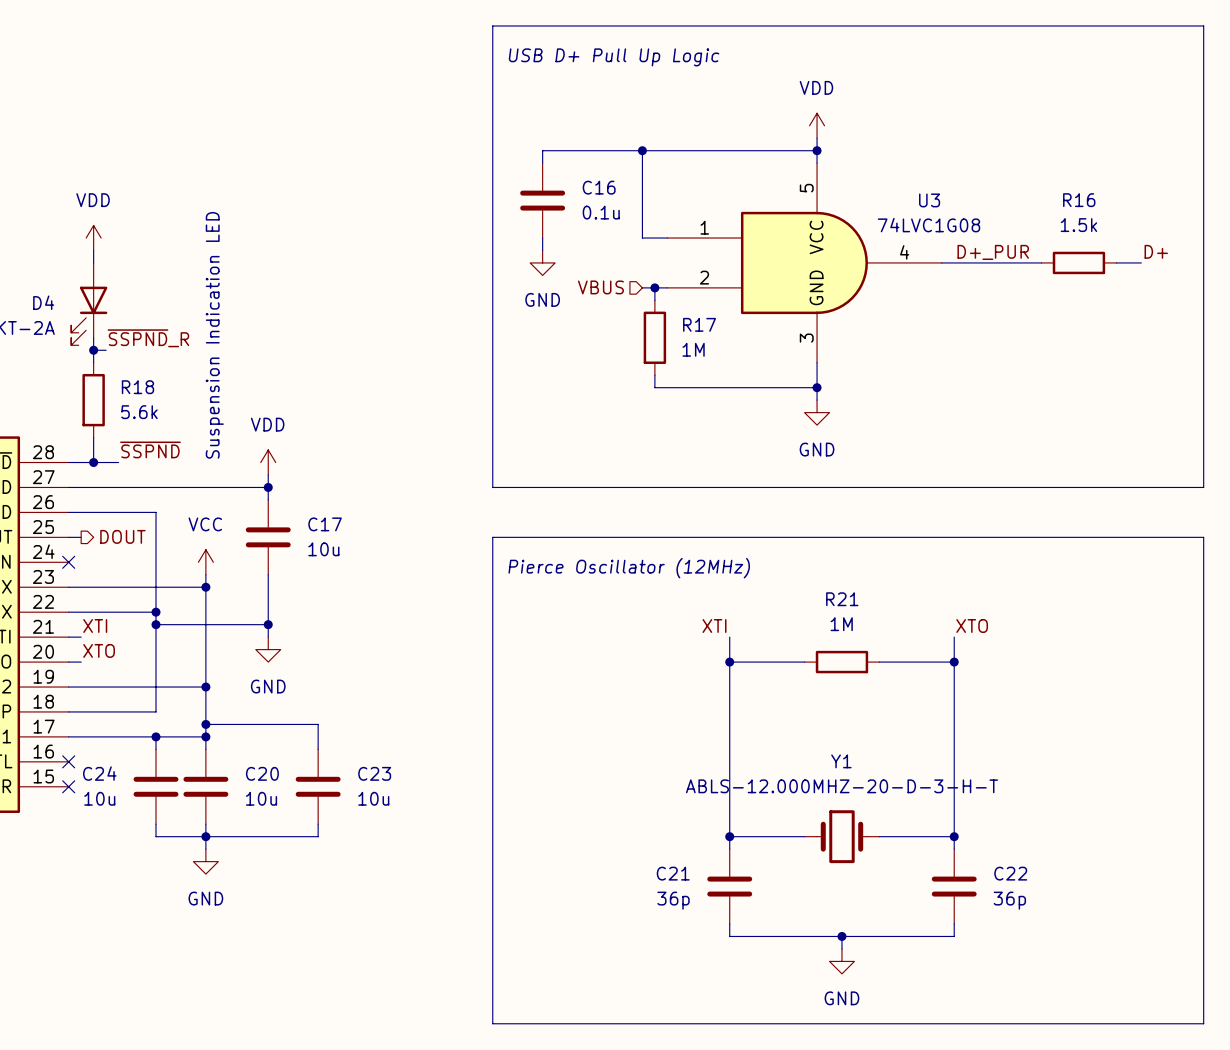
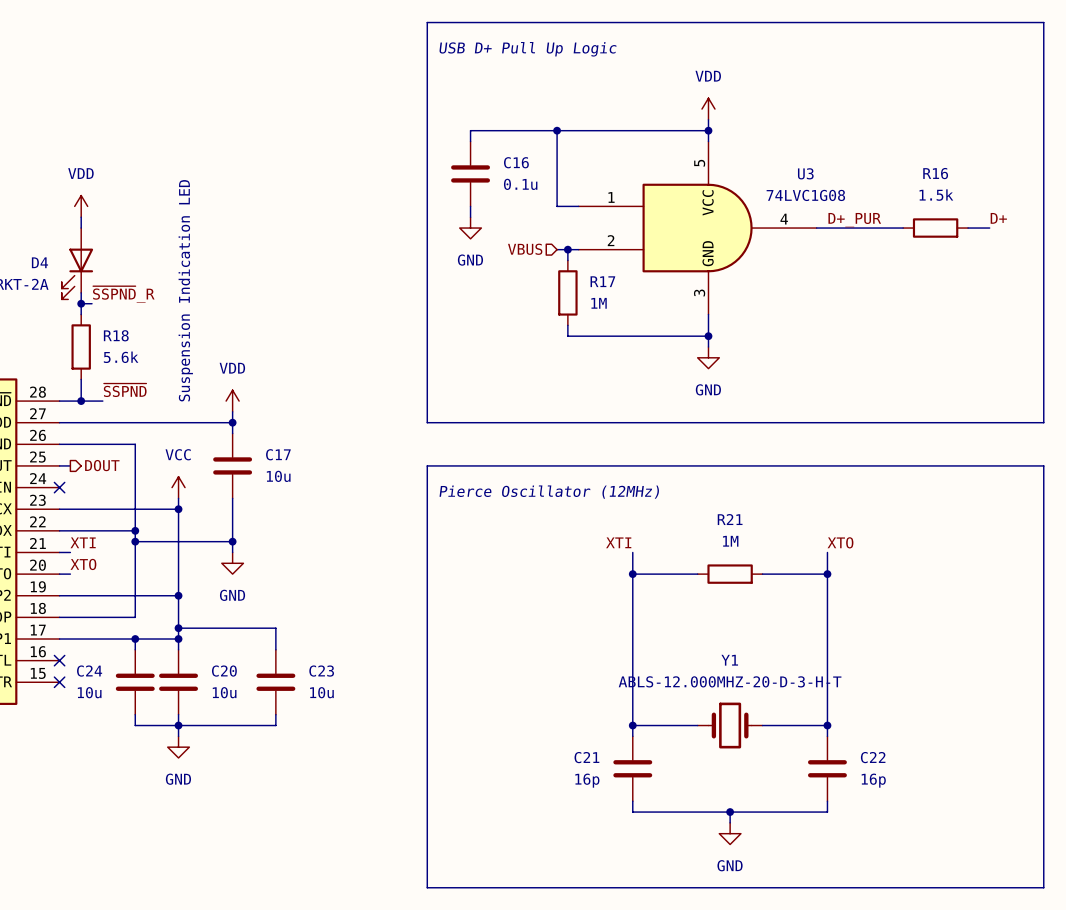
C21 value: 36p (673, 900) -> 16p (587, 780)
C22 value: 36p (1009, 900) -> 16p (873, 780)

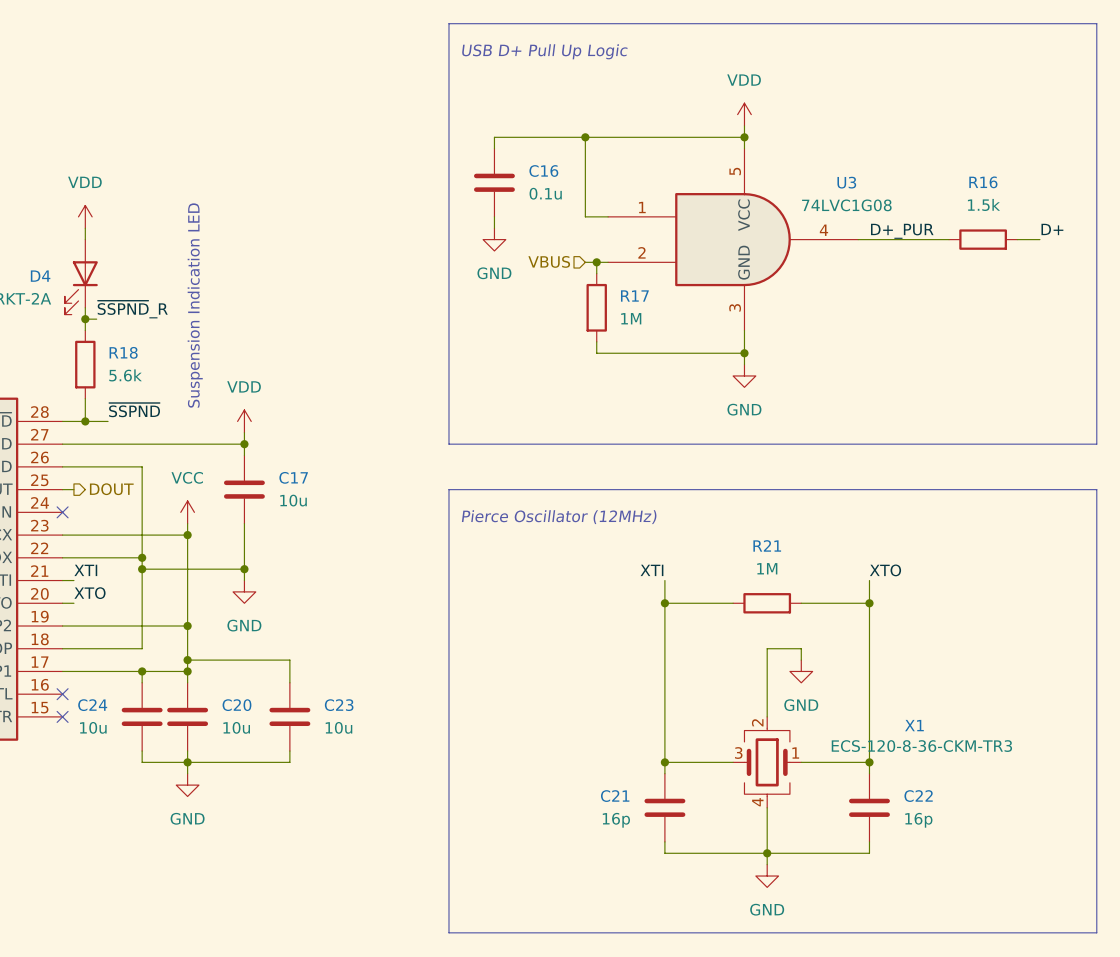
wire: none -> (801, 660) (801, 648) (767, 648) (767, 716)
power symbol: none -> GND (801, 671)
Y1: ABLS-12.000MHZ-20-D-3-H-T (730, 725) -> none
X1: none -> ECS-120-8-36-CKM-TR3 (767, 762)
wire: none -> (767, 807) (767, 853)

